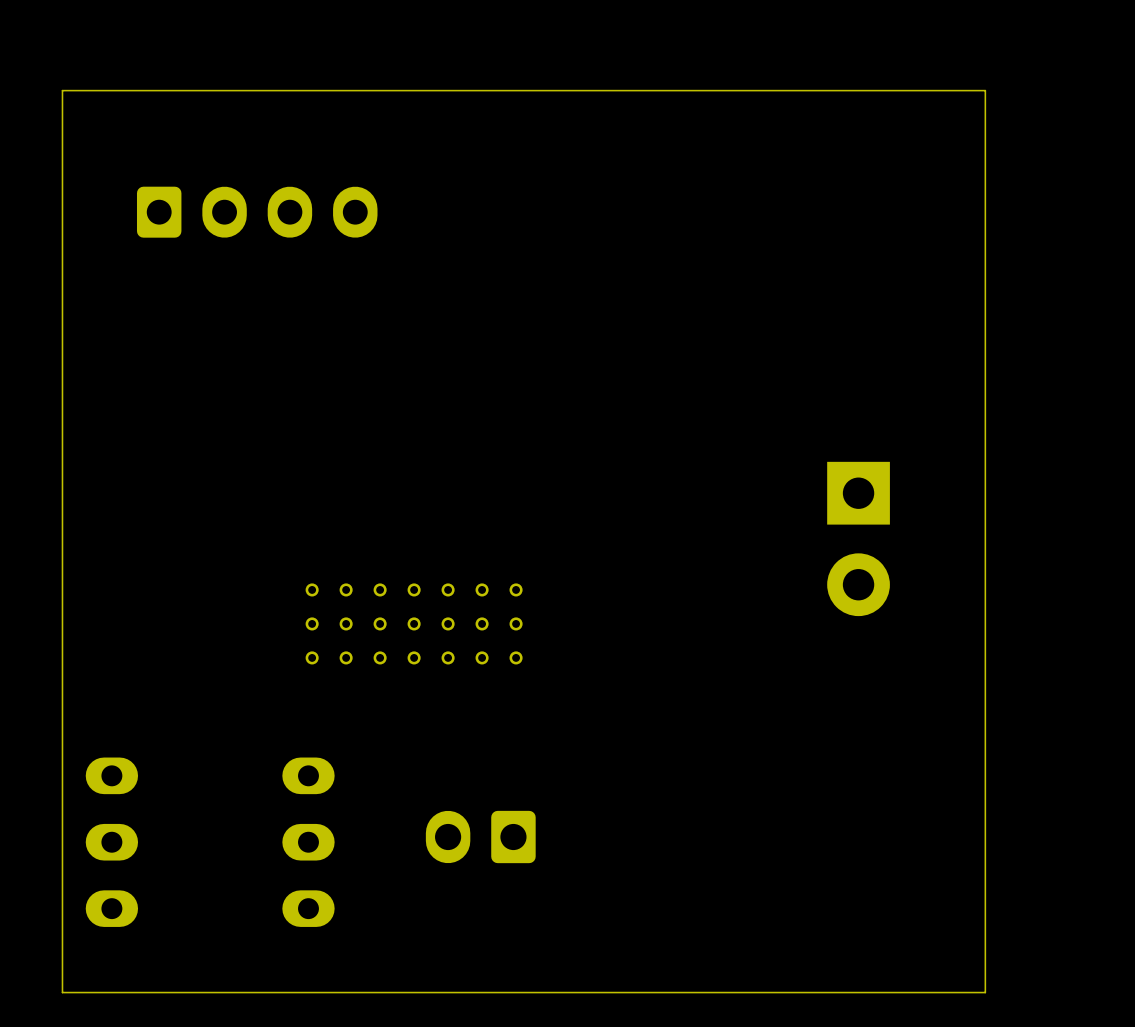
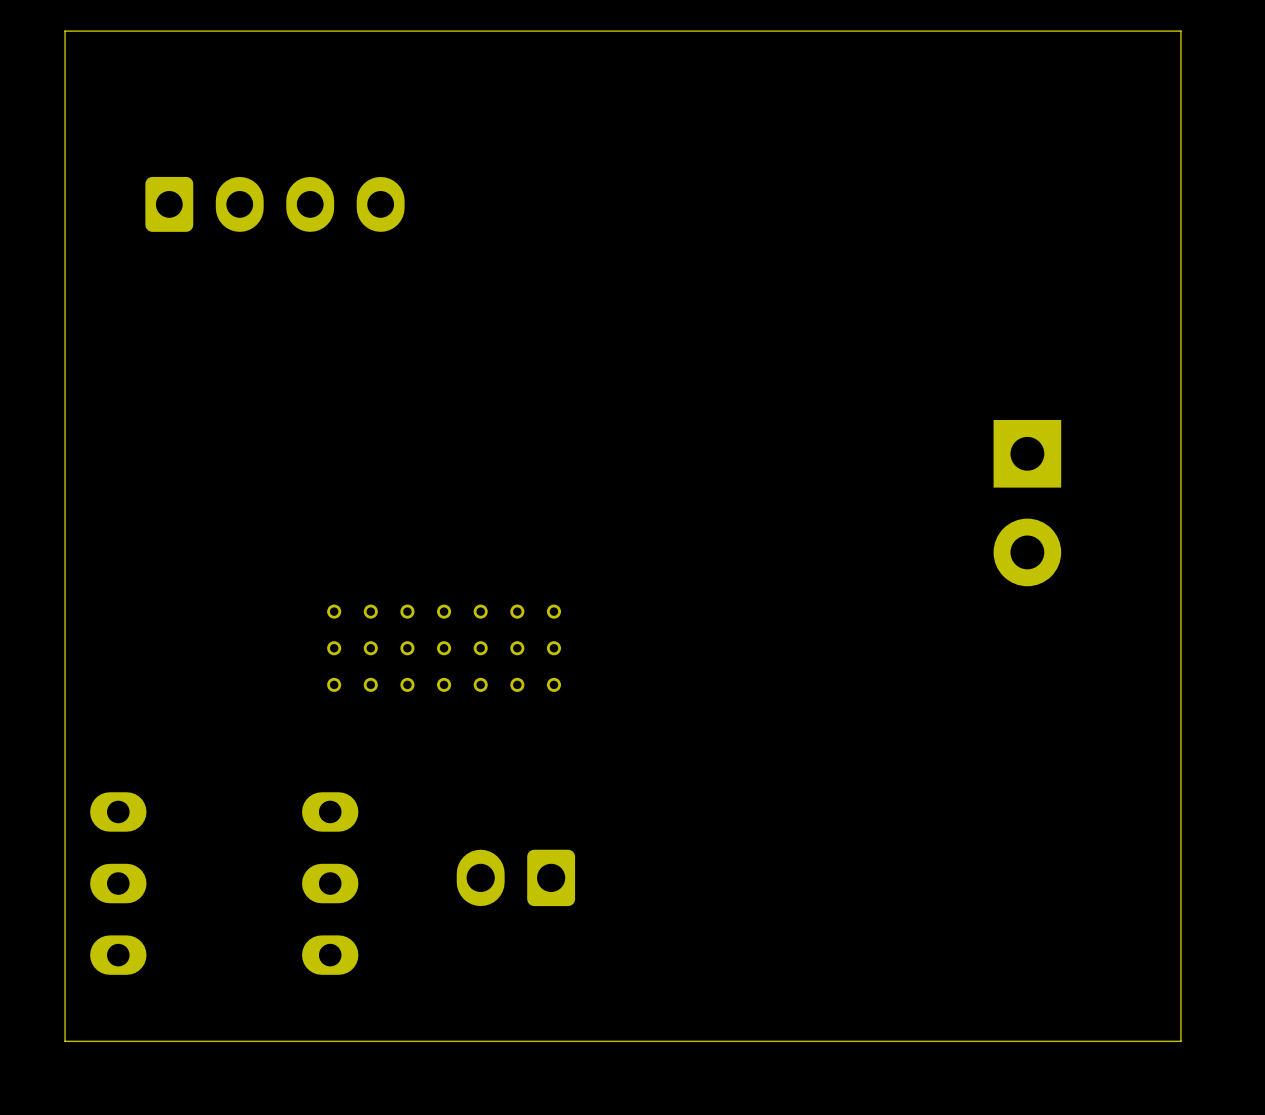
board edge: (62, 90) (985, 90) (985, 992) (62, 992) (62, 988) -> (65, 73) (65, 31) (1180, 31) (1180, 1041) (65, 1041)
part position: (858, 538) -> (1027, 503)

